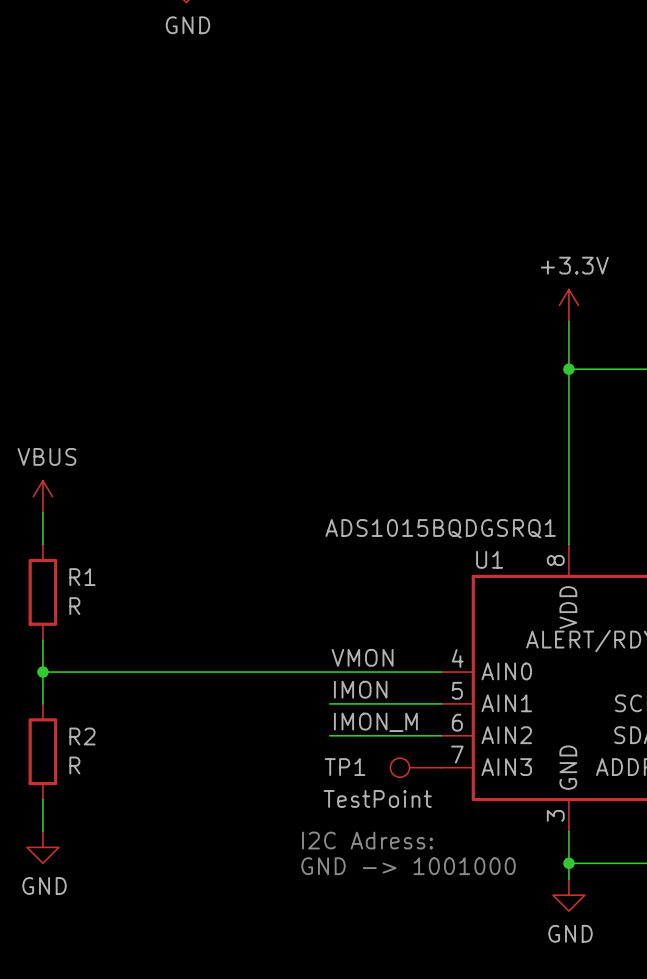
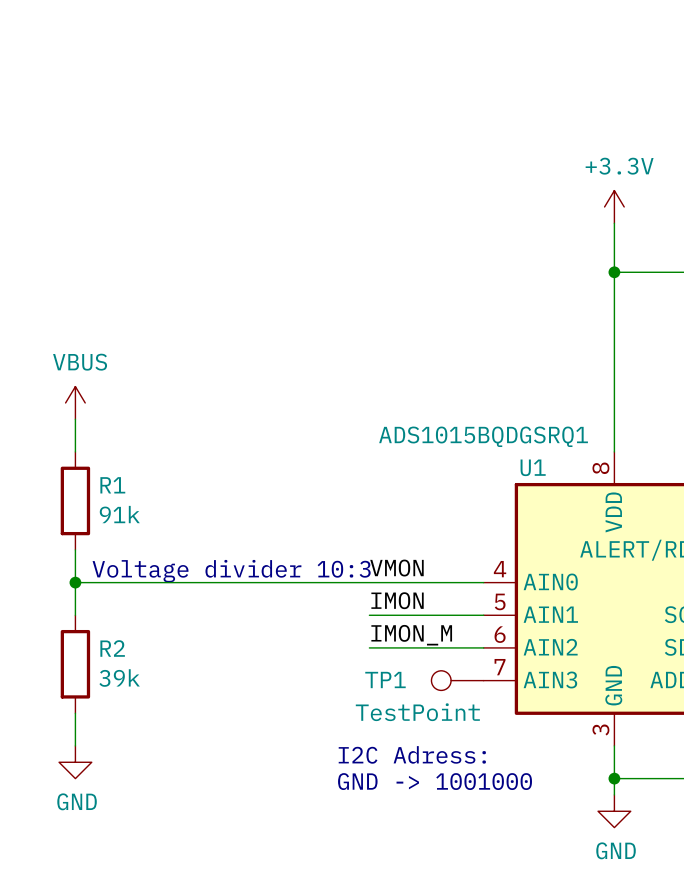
R1 value: R (74, 606) -> 91k (119, 514)
text: none -> Voltage divider 10:3 (231, 571)
R2 value: R (74, 765) -> 39k (119, 678)

